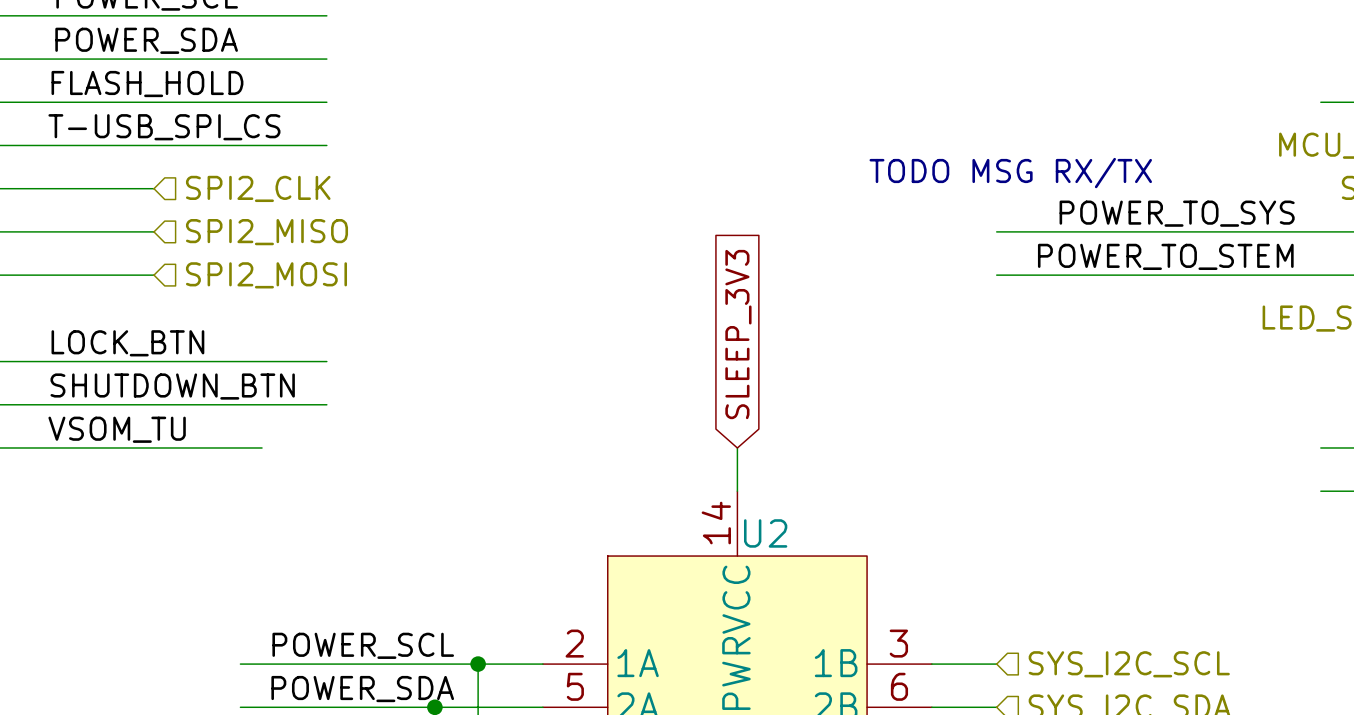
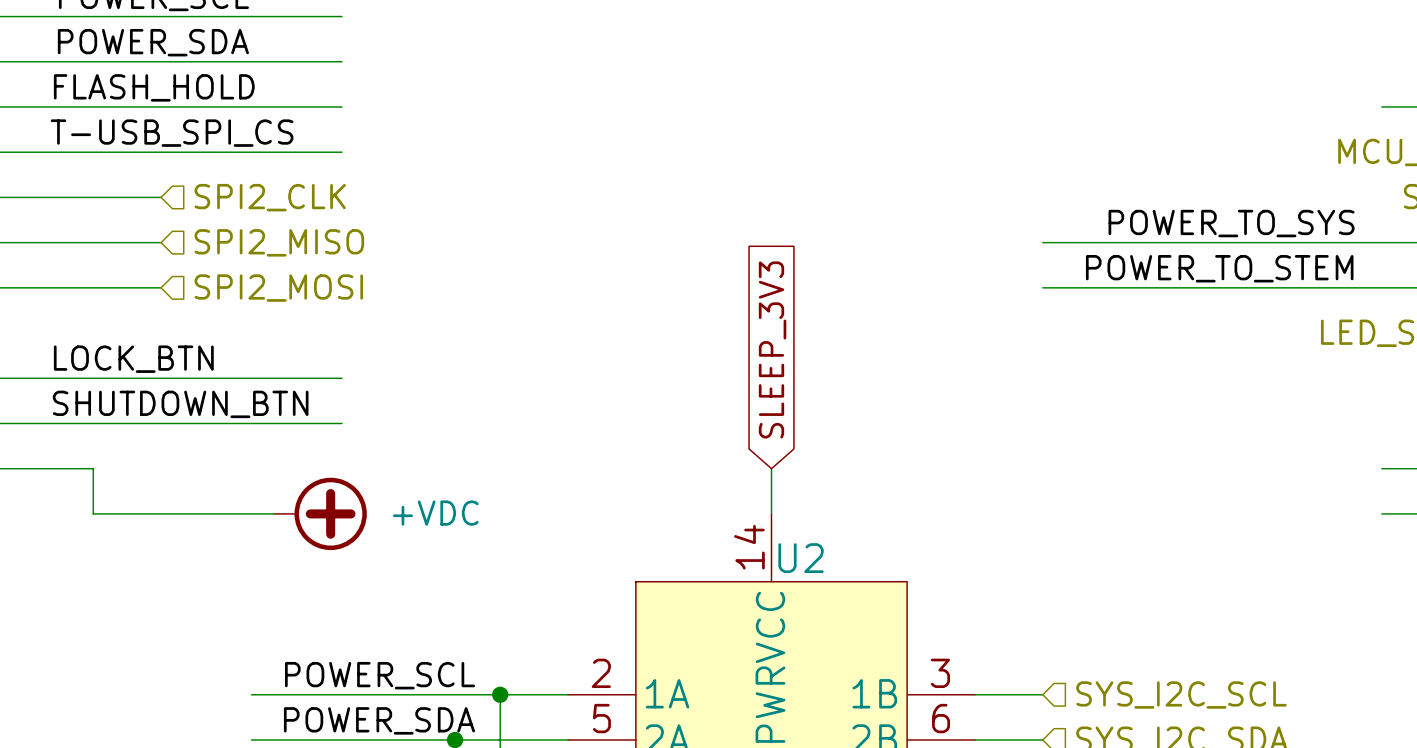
text: TODO MSG RX/TX (1010, 173) -> none
label: VSOM_TU (117, 429) -> none
wire: (89, 447) (262, 447) -> (93, 468) (93, 513) (274, 513)
power symbol: none -> +VDC (320, 513)

